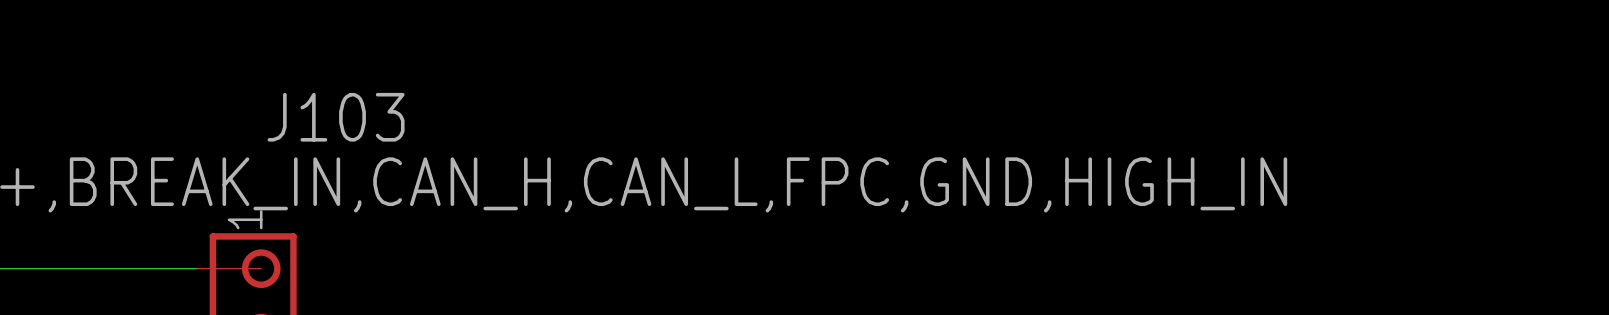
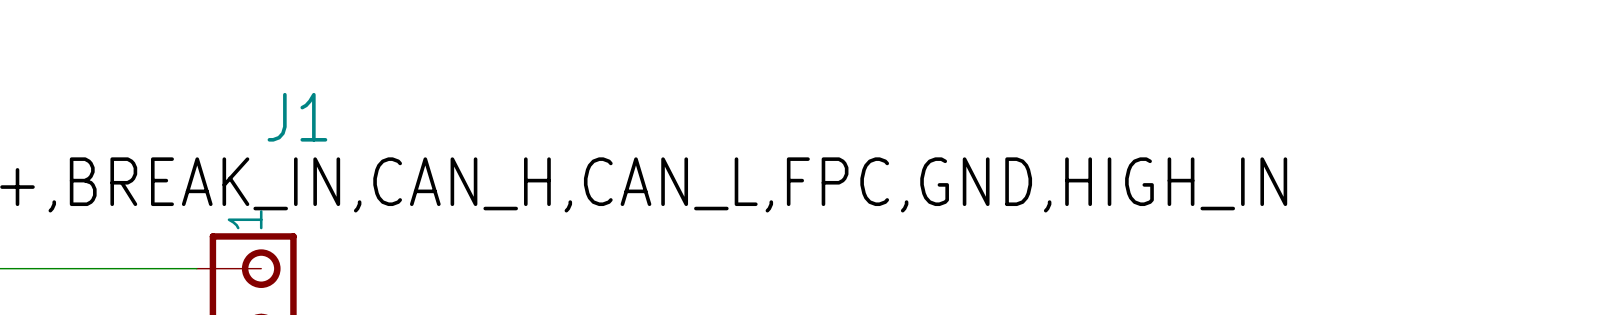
J103 name: J103 (336, 117) -> J1 (297, 117)

